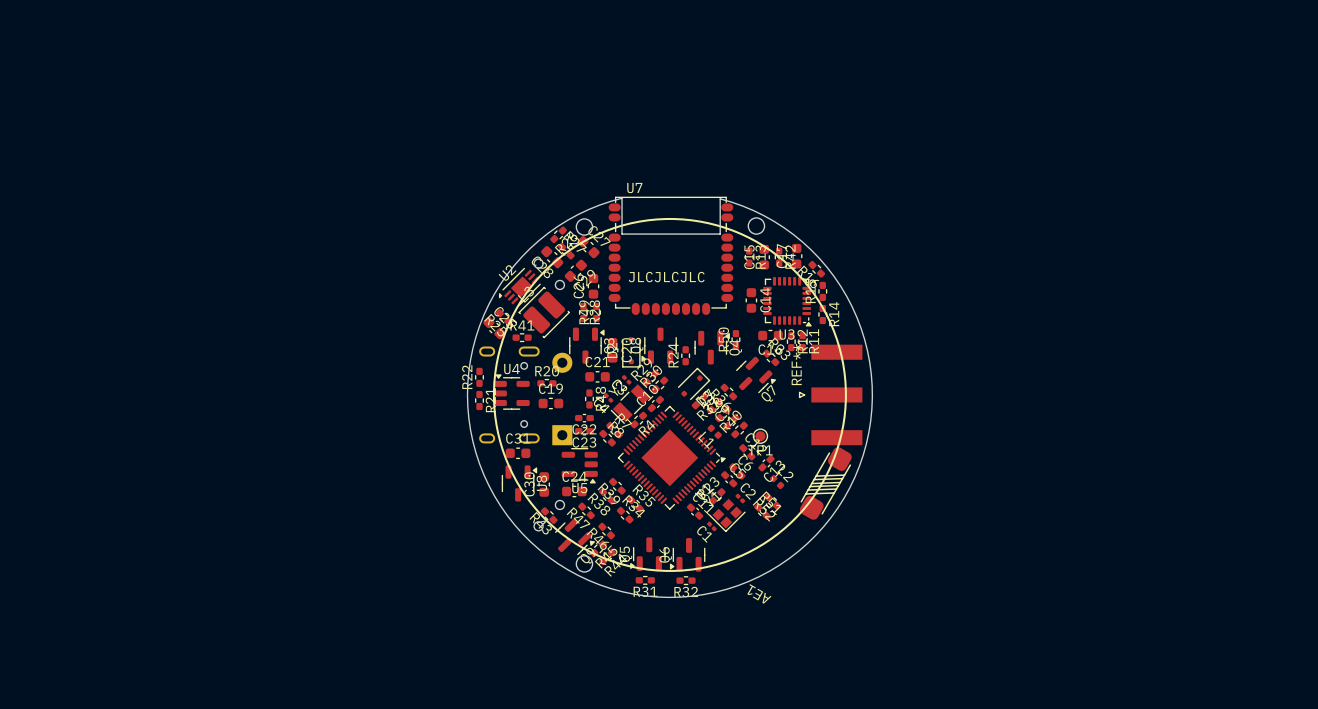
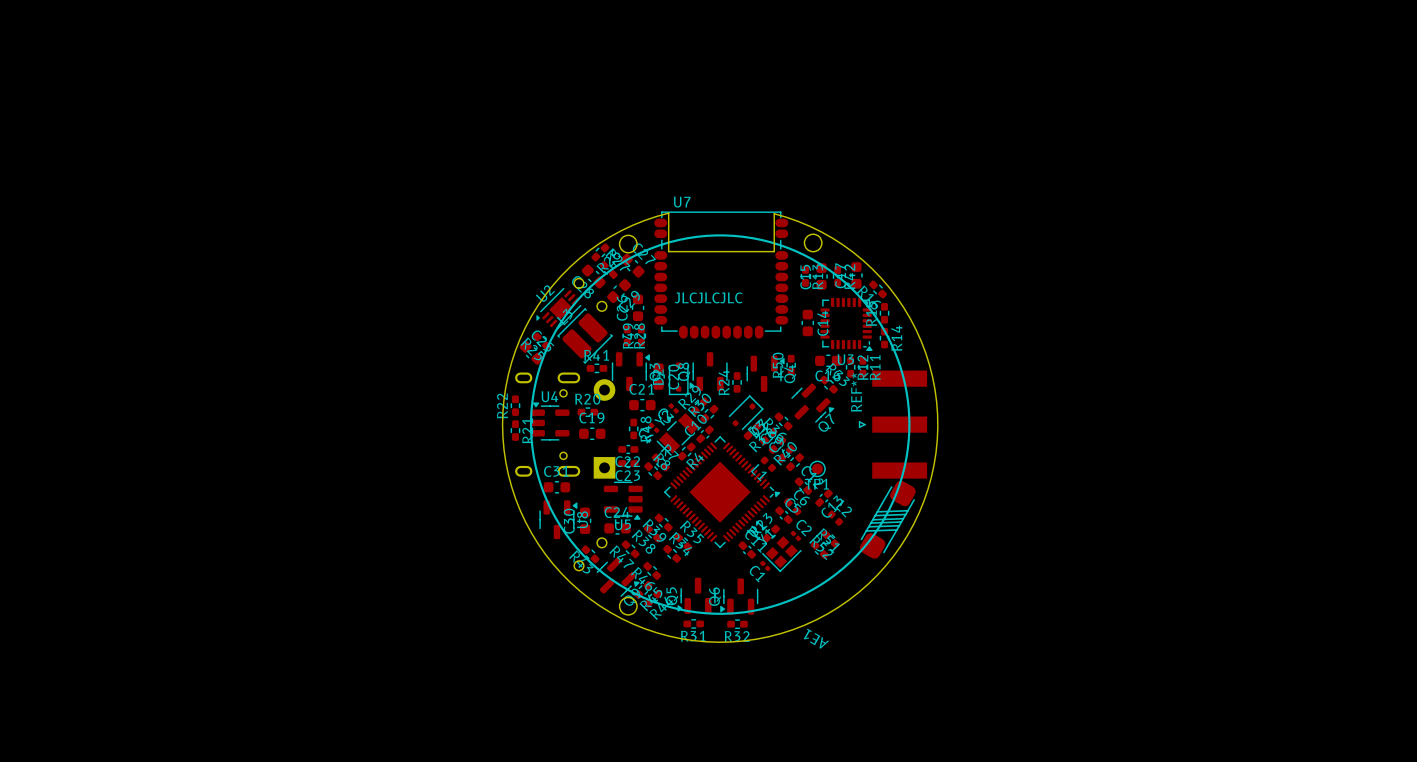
R41 position: (522, 337) -> (596, 368)

